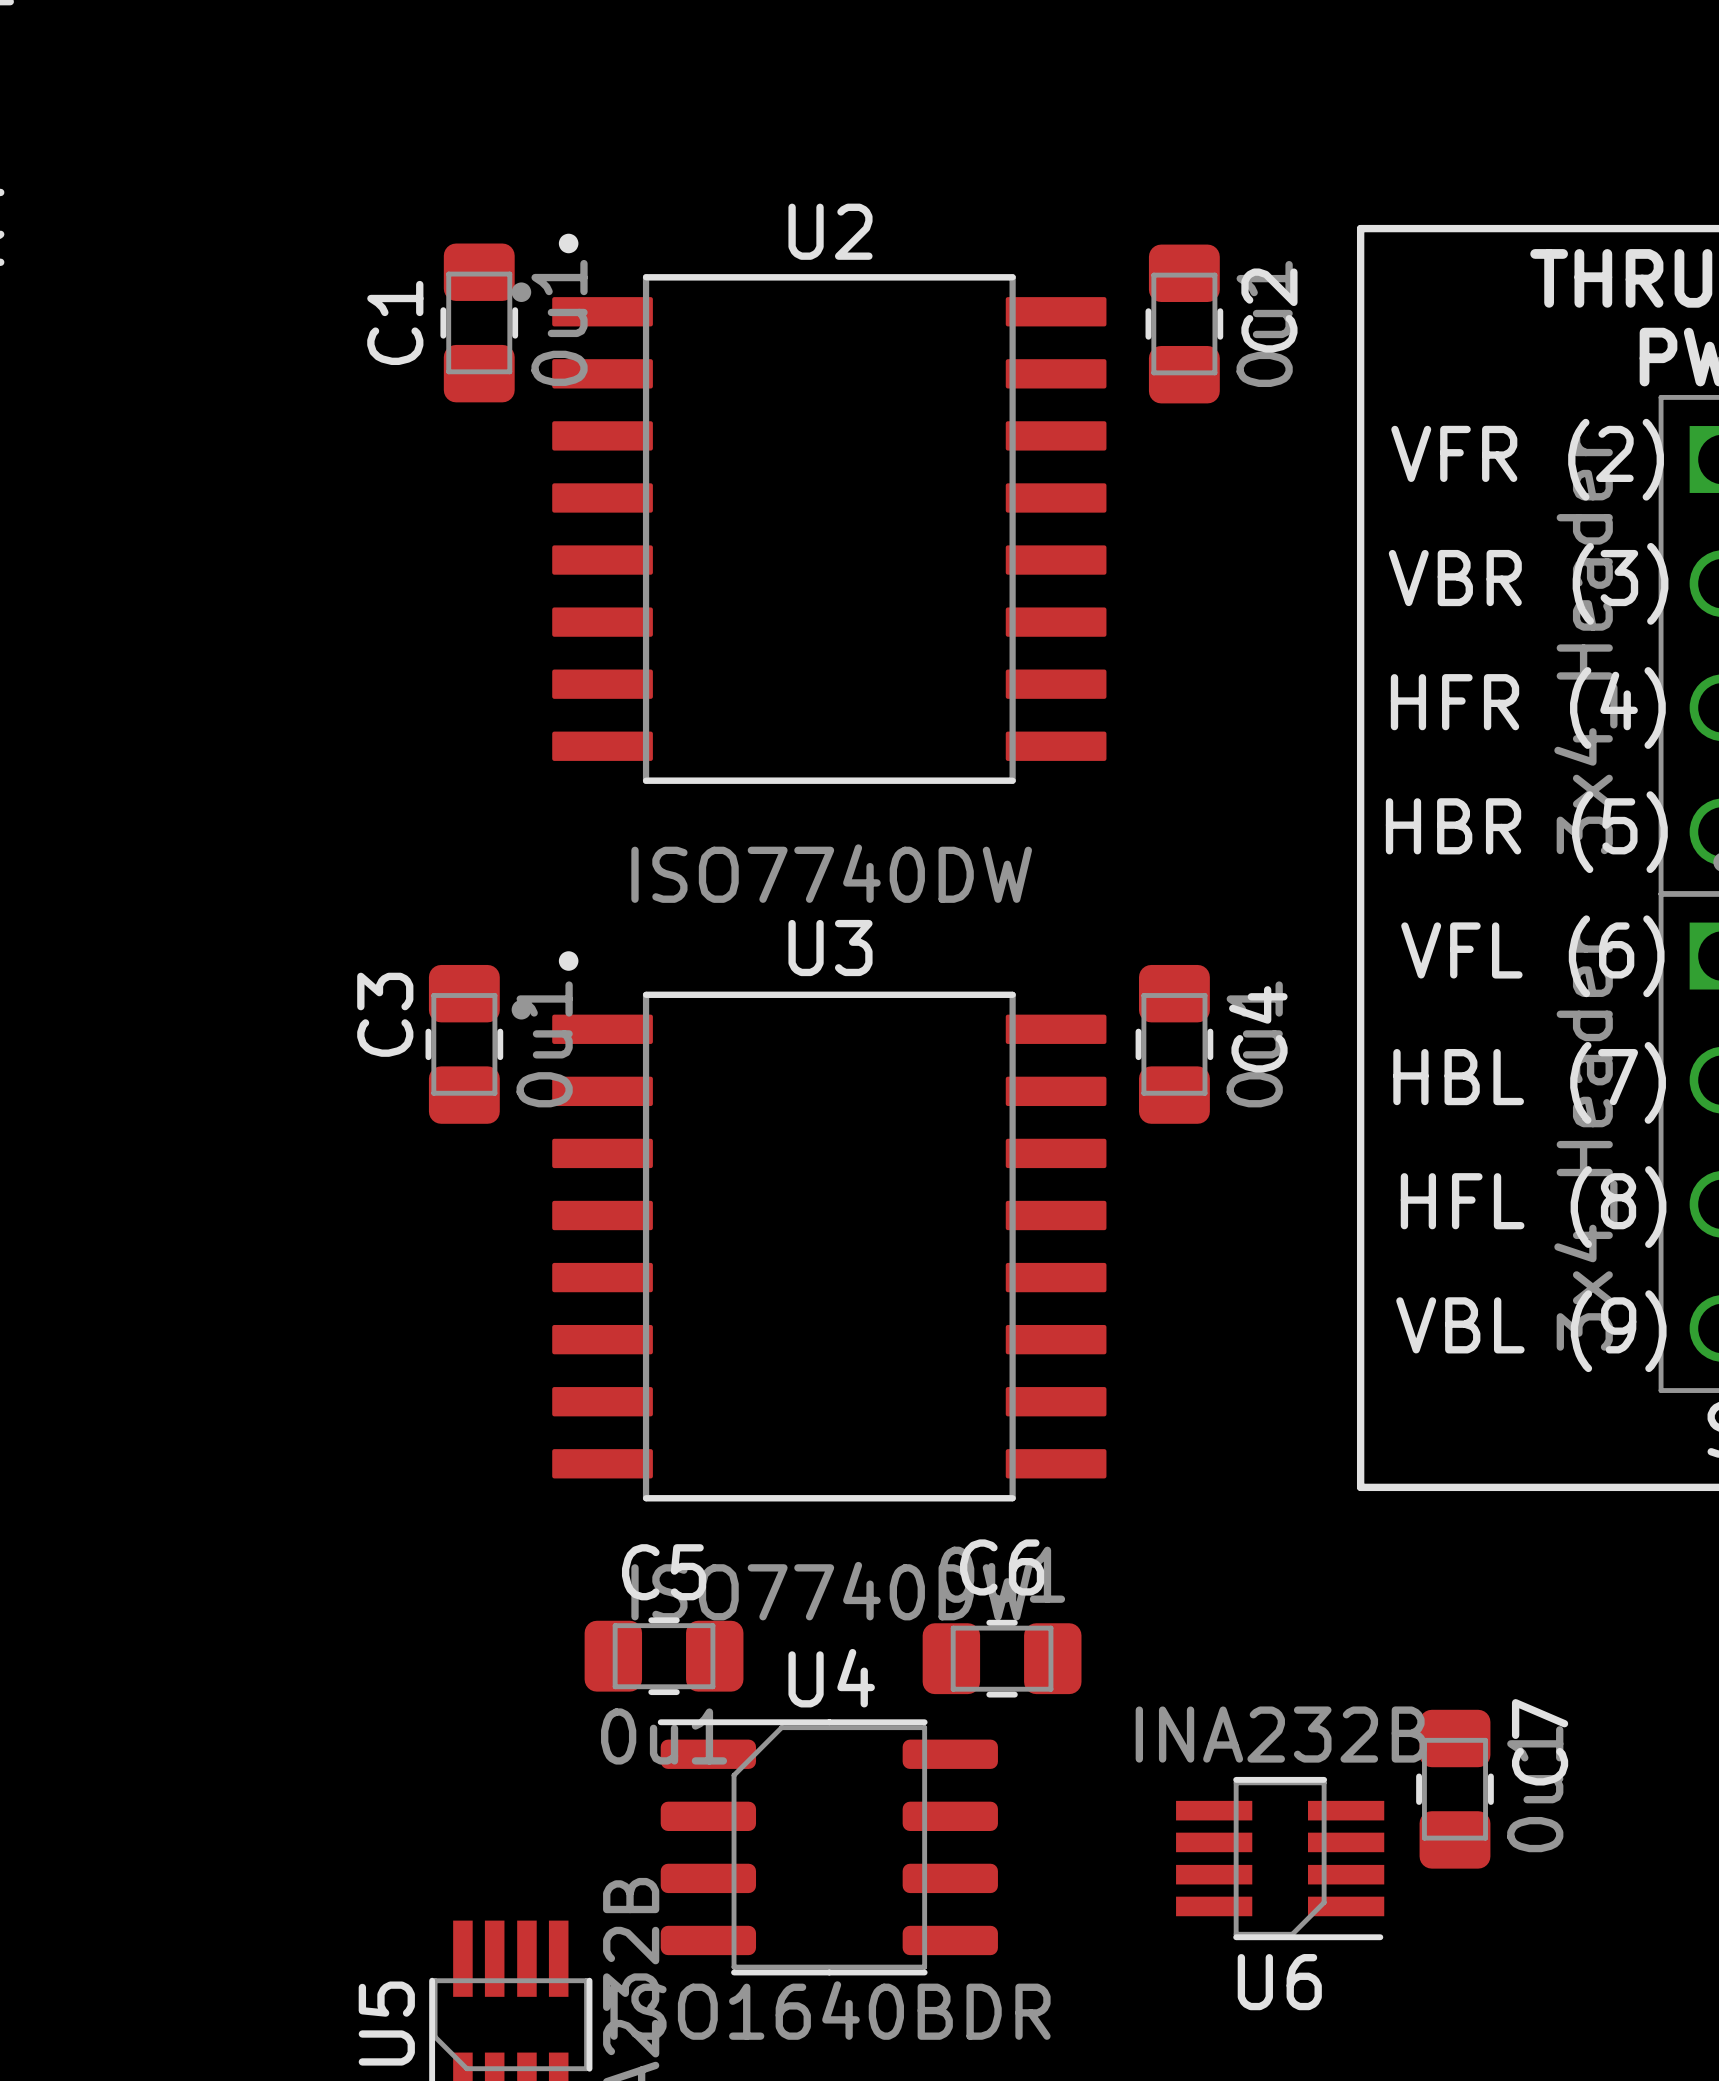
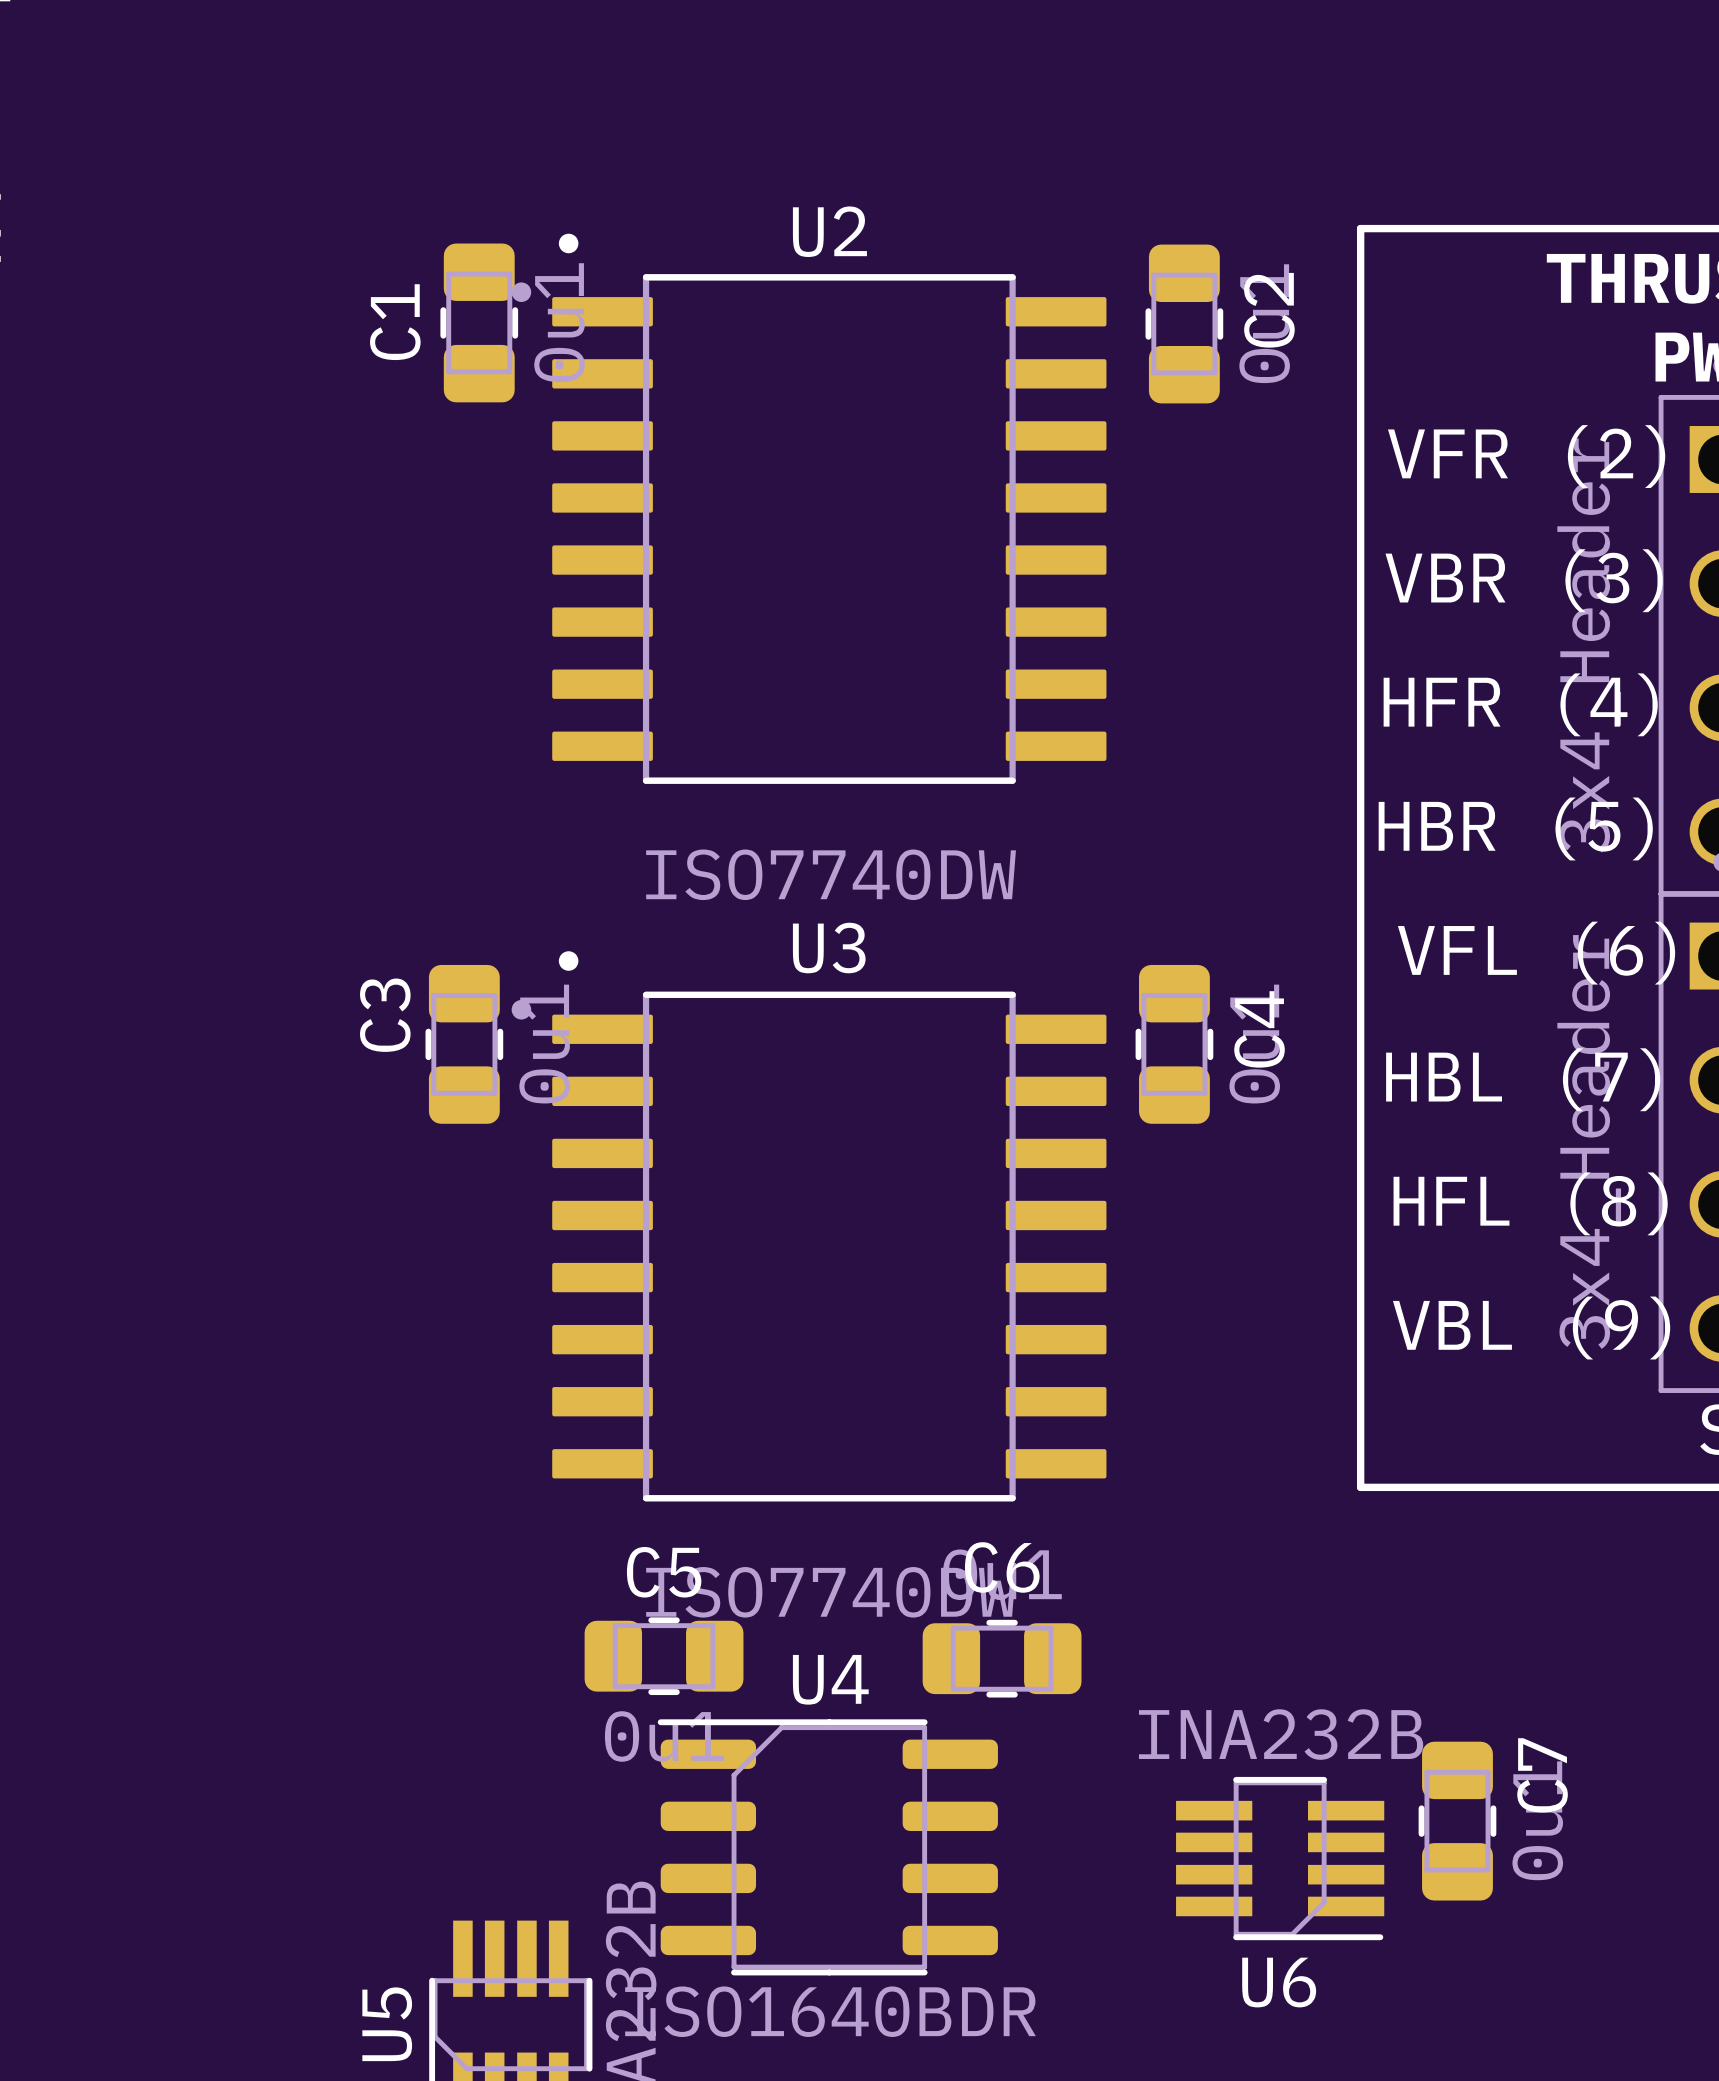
C7 position: (1454, 1789) -> (1457, 1821)

